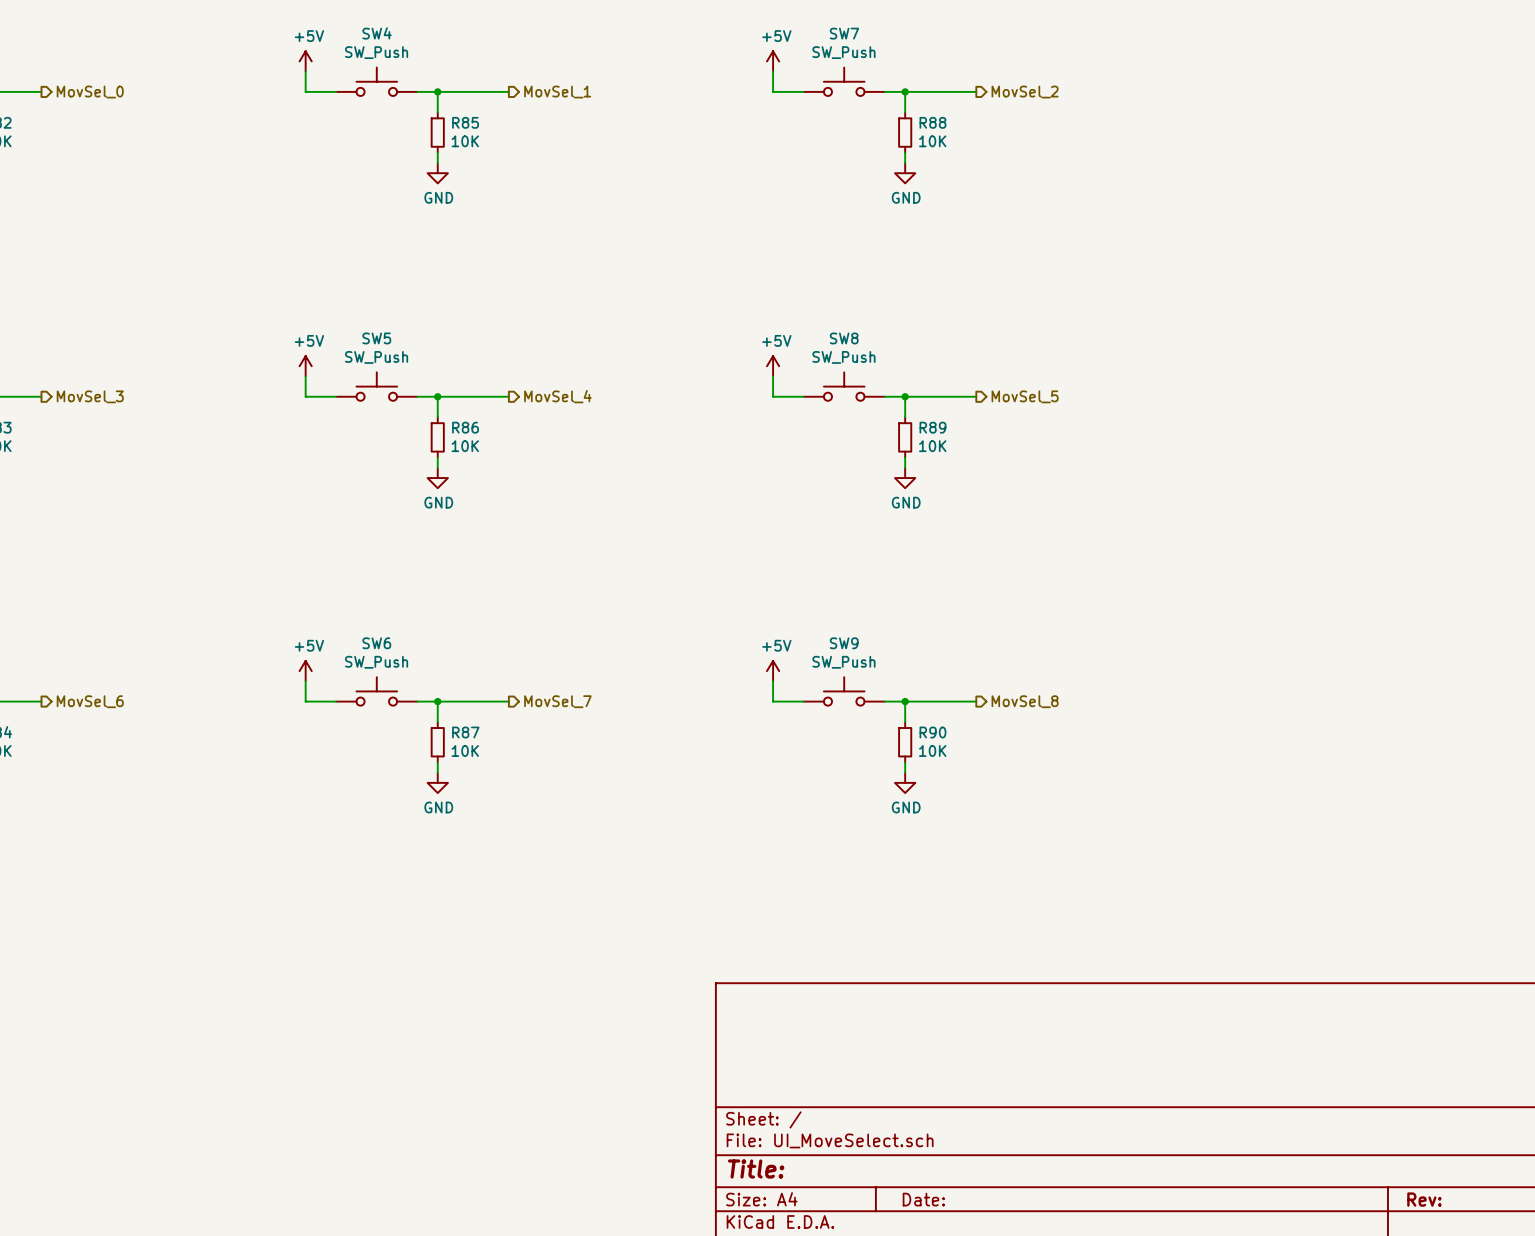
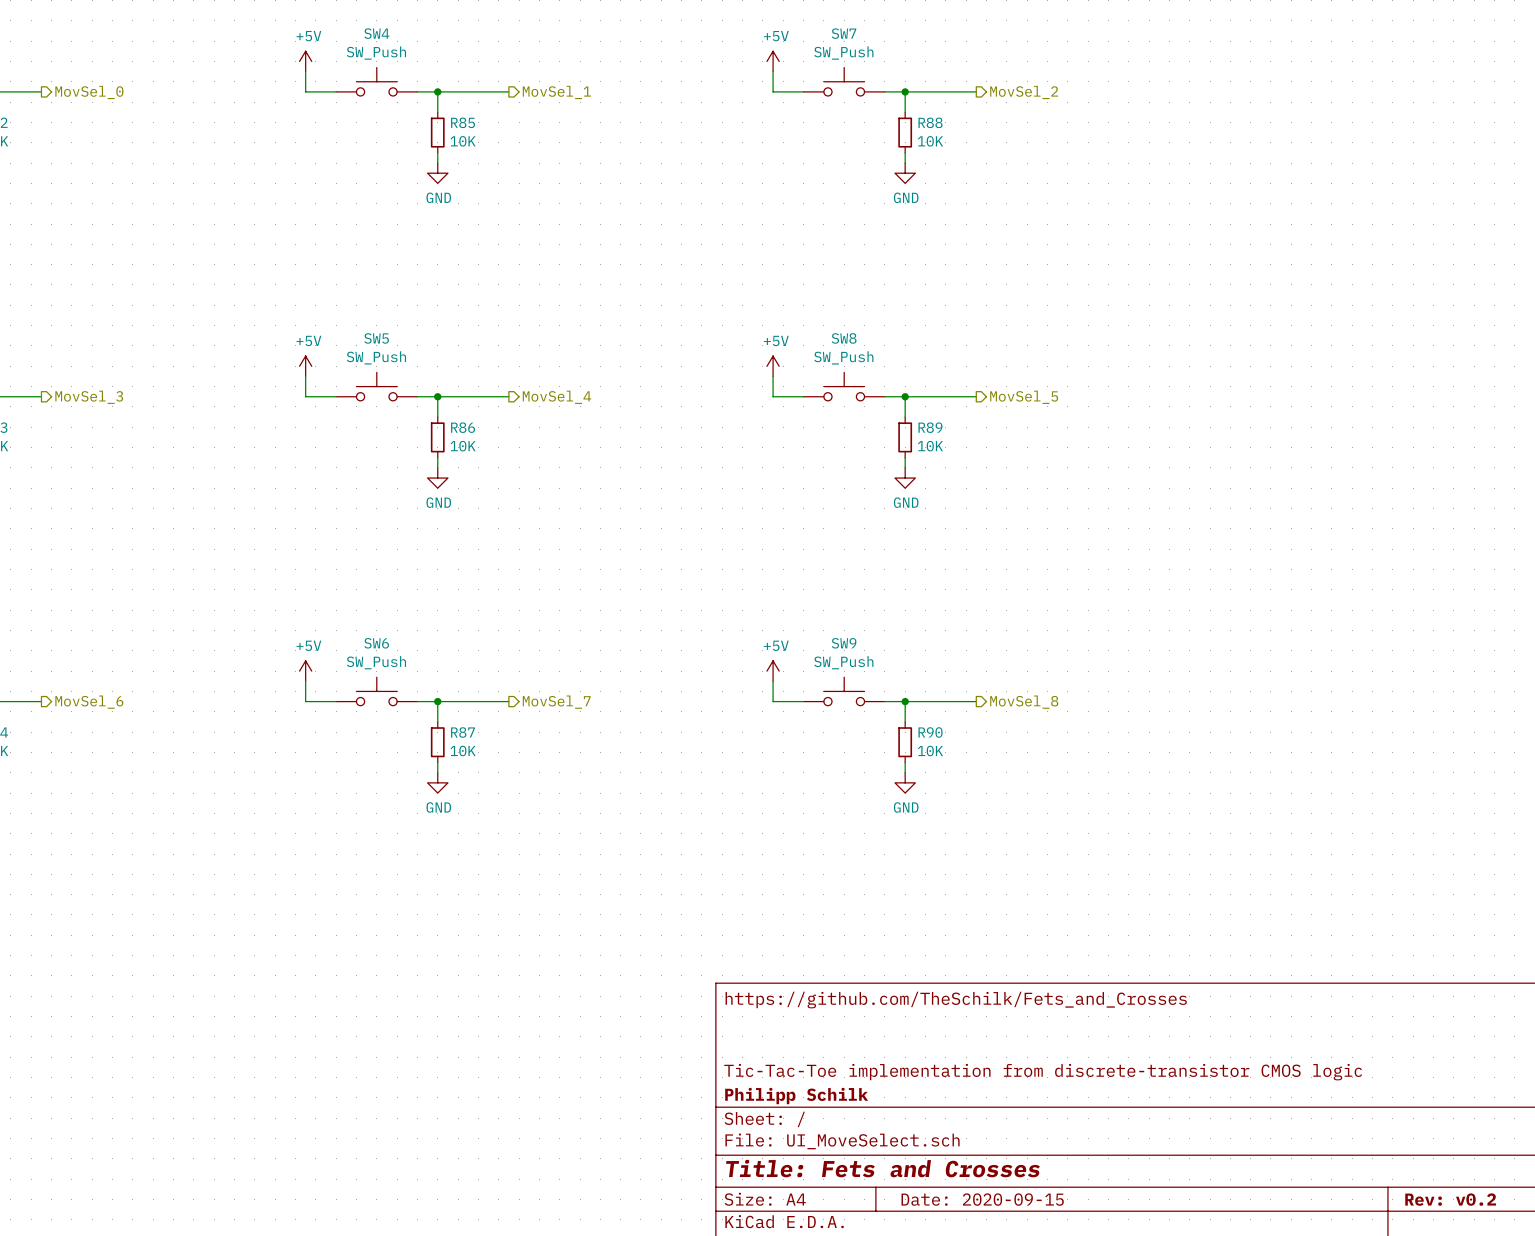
title block: none -> https://github.com/TheSchilk/Fets_and_Crosses (956, 1000)
title block: none -> Tic-Tac-Toe implementation from discrete-transistor CMOS logic (1043, 1072)
title block: none -> Philipp Schilk (796, 1096)
title block: Title: (756, 1169) -> Title: Fets and Crosses (883, 1168)
title block: Date: (923, 1199) -> Date: 2020-09-15 (982, 1199)
title block: Rev: (1424, 1199) -> Rev: v0.2 (1450, 1199)

